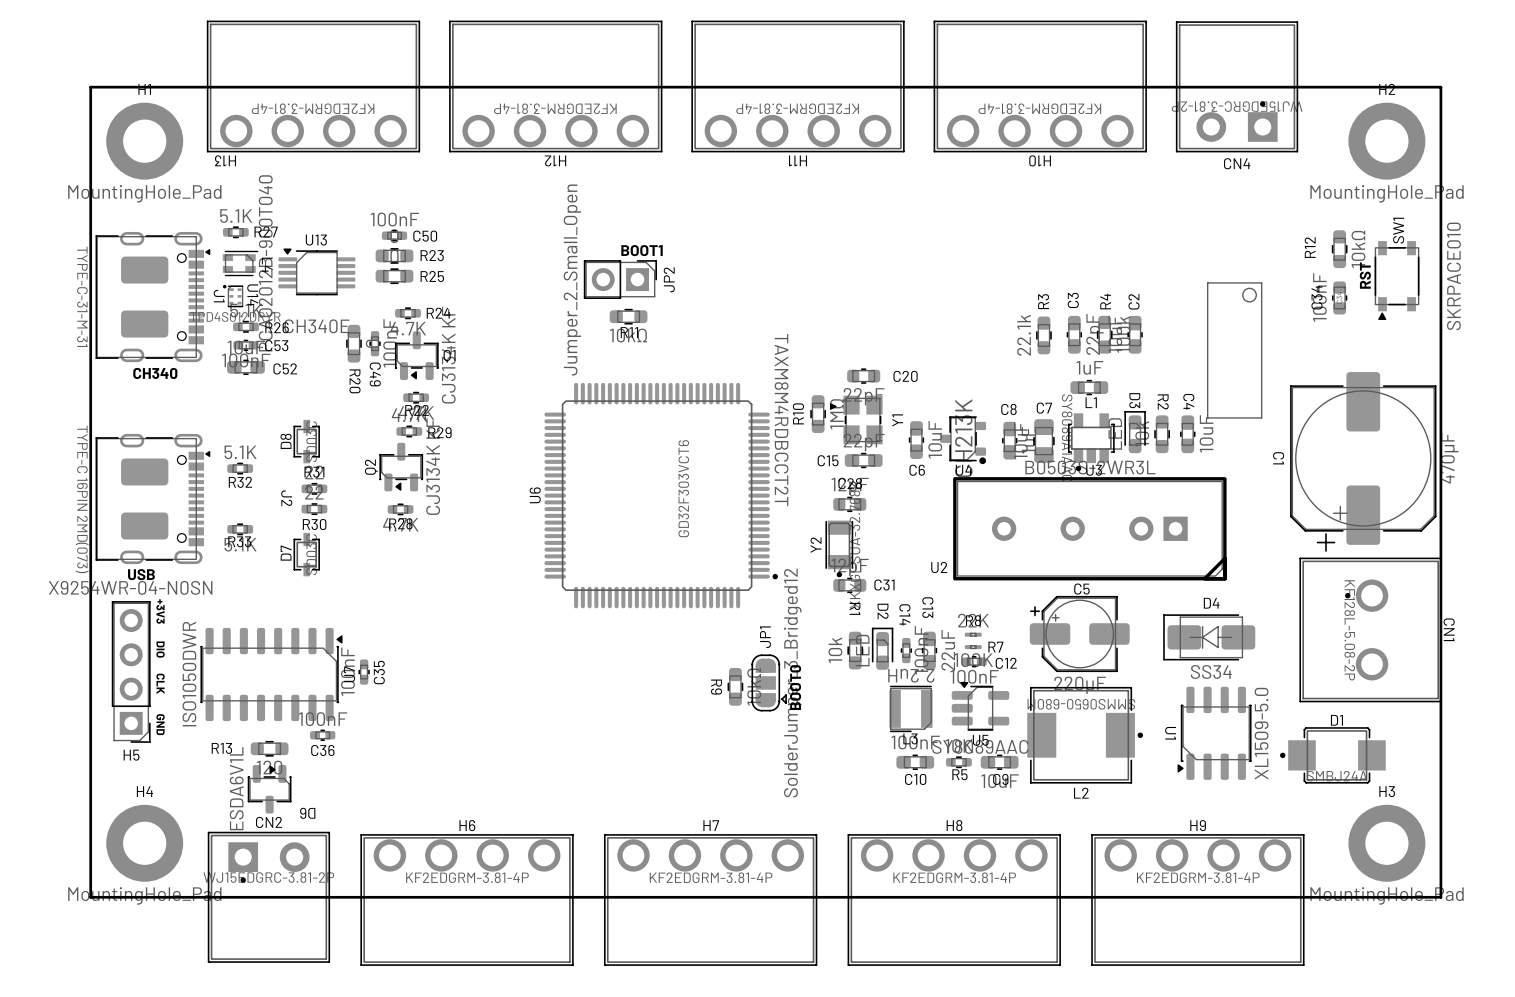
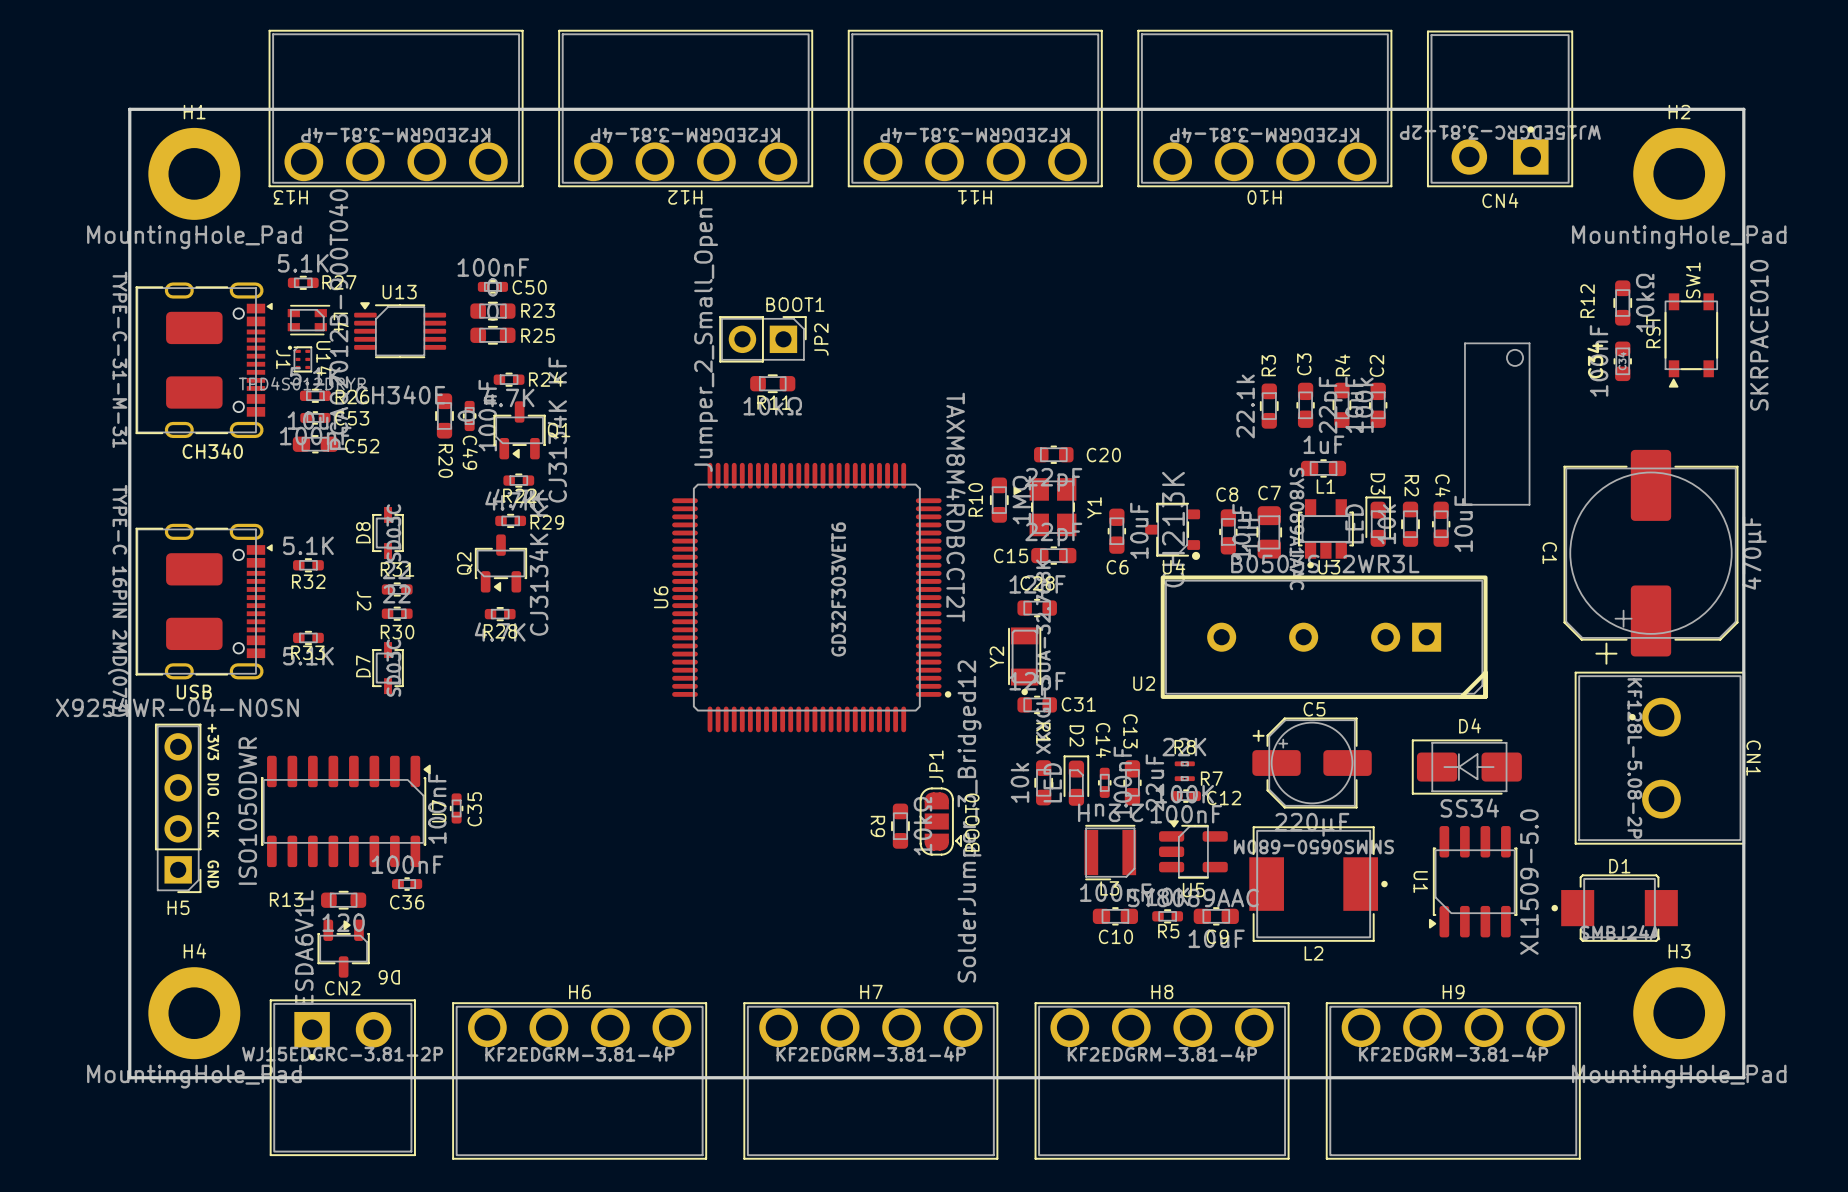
U6 value: GD32F303VCT6 (683, 488) -> GD32F303VET6 (838, 589)

